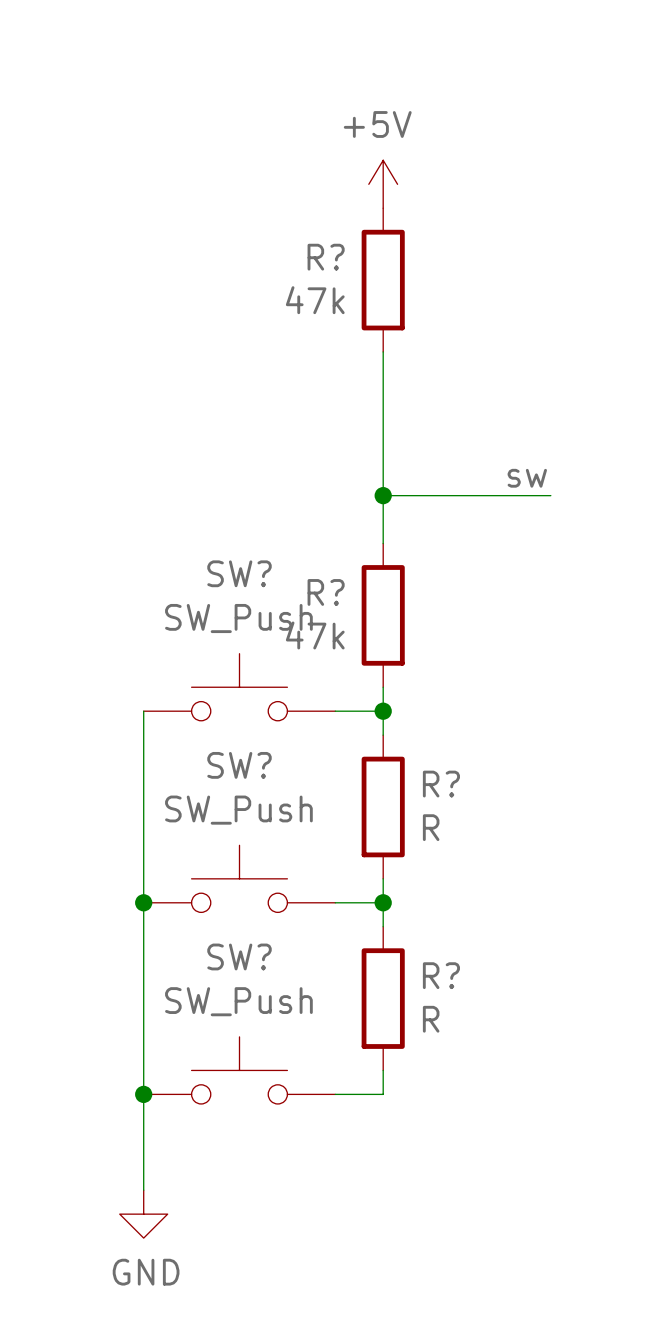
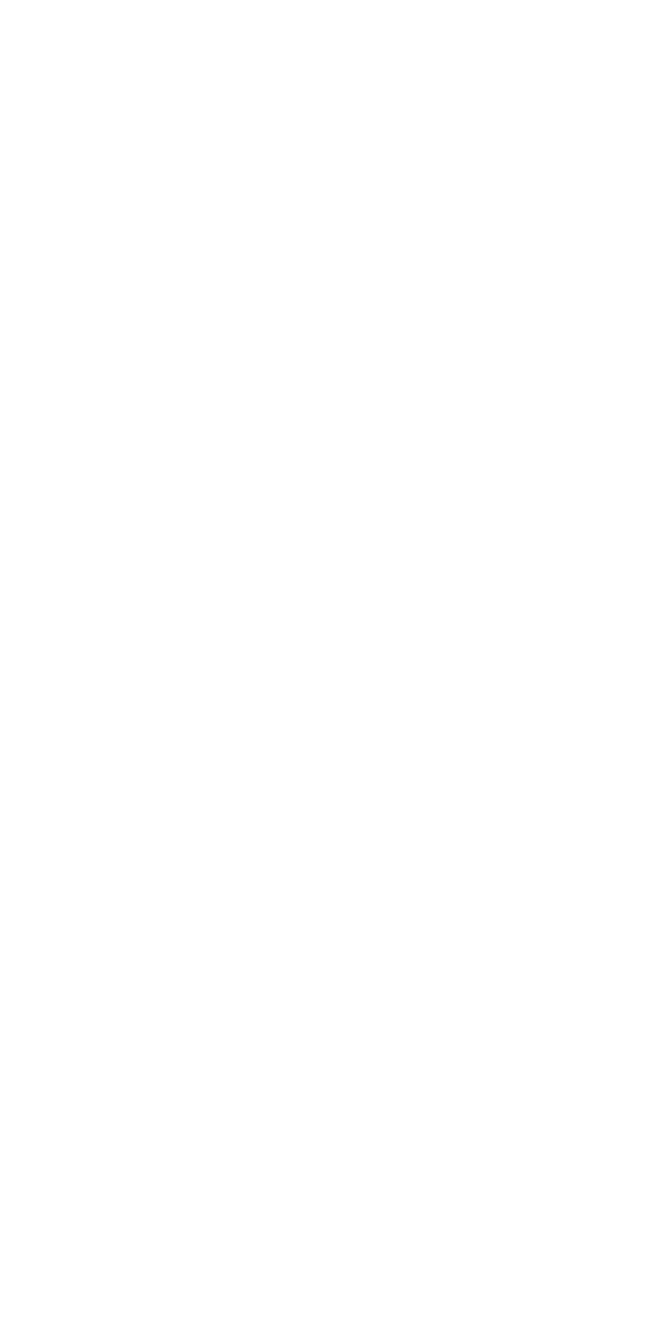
power symbol: +5V (383, 184) -> none
R?: 47k (383, 280) -> none
wire: (383, 351) (383, 543) -> none
label: sw (527, 478) -> none
wire: (383, 495) (550, 495) -> none
junction: (383, 495) -> none
R?: 47k (383, 615) -> none
SW?: SW_Push (239, 687) -> none
wire: (383, 687) (383, 735) -> none
wire: (143, 711) (143, 1190) -> none
wire: (335, 711) (383, 711) -> none
junction: (383, 711) -> none
R?: R (383, 806) -> none
SW?: SW_Push (239, 878) -> none
wire: (383, 878) (383, 926) -> none
junction: (143, 902) -> none
wire: (335, 902) (383, 902) -> none
junction: (383, 902) -> none
R?: R (383, 998) -> none
SW?: SW_Push (239, 1070) -> none
wire: (383, 1070) (383, 1094) (335, 1094) -> none
junction: (143, 1094) -> none
power symbol: GND (143, 1214) -> none

